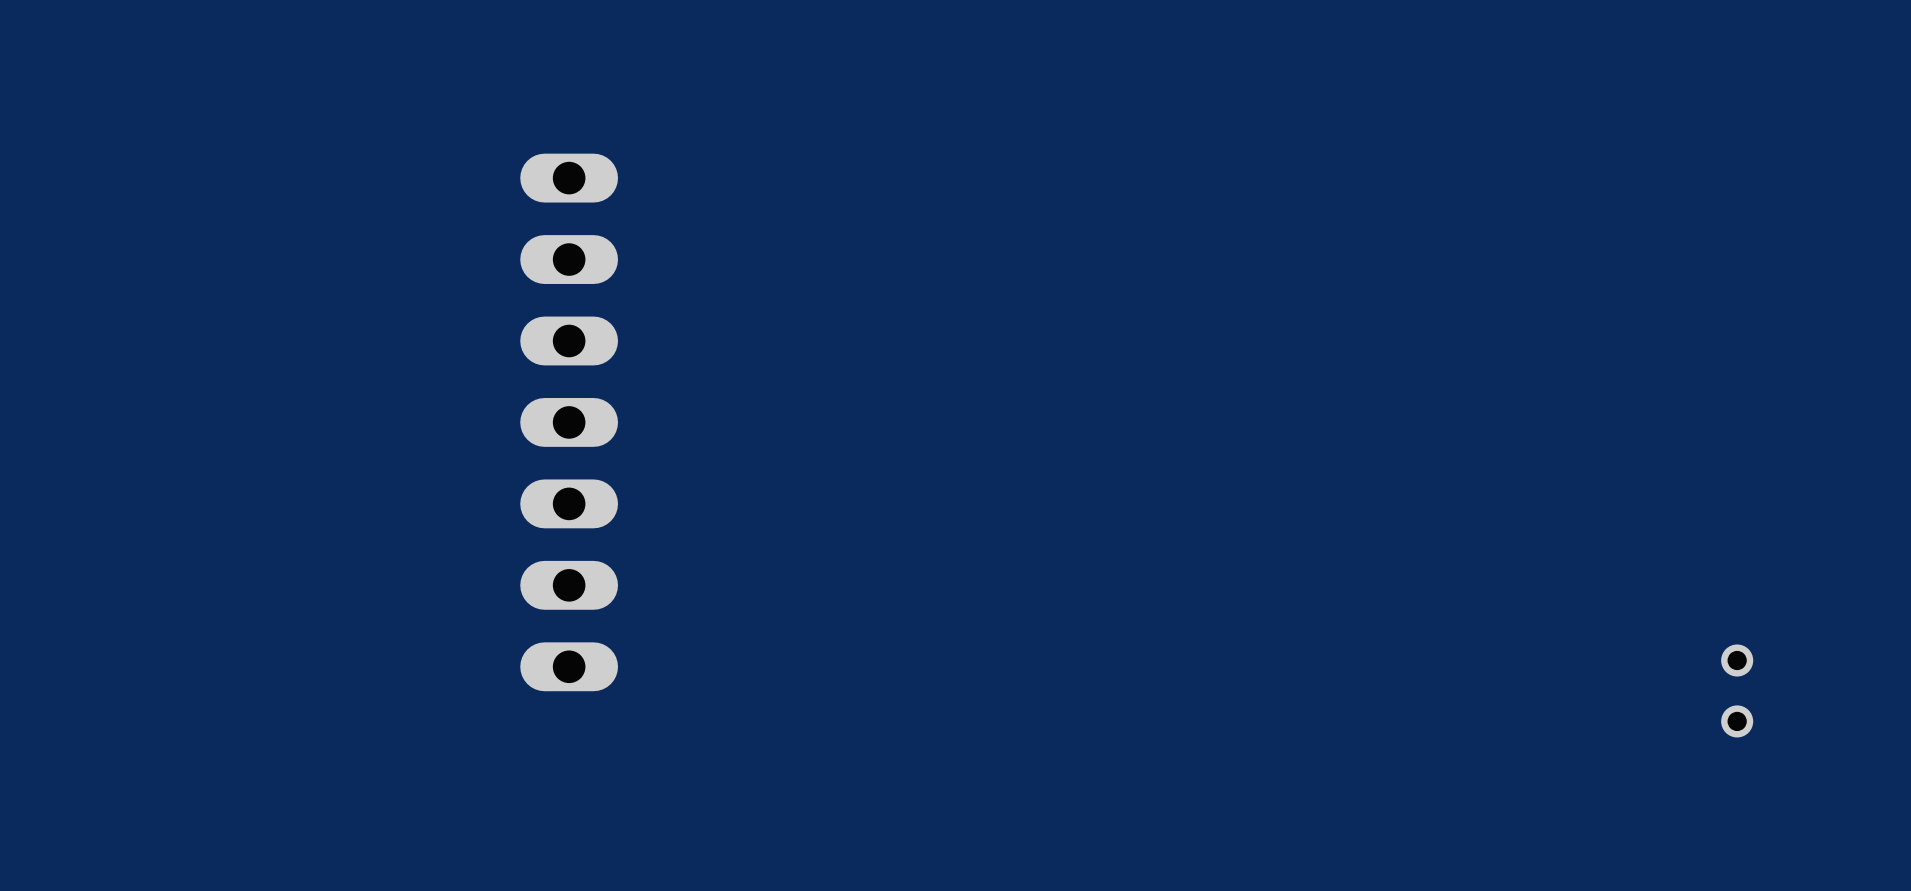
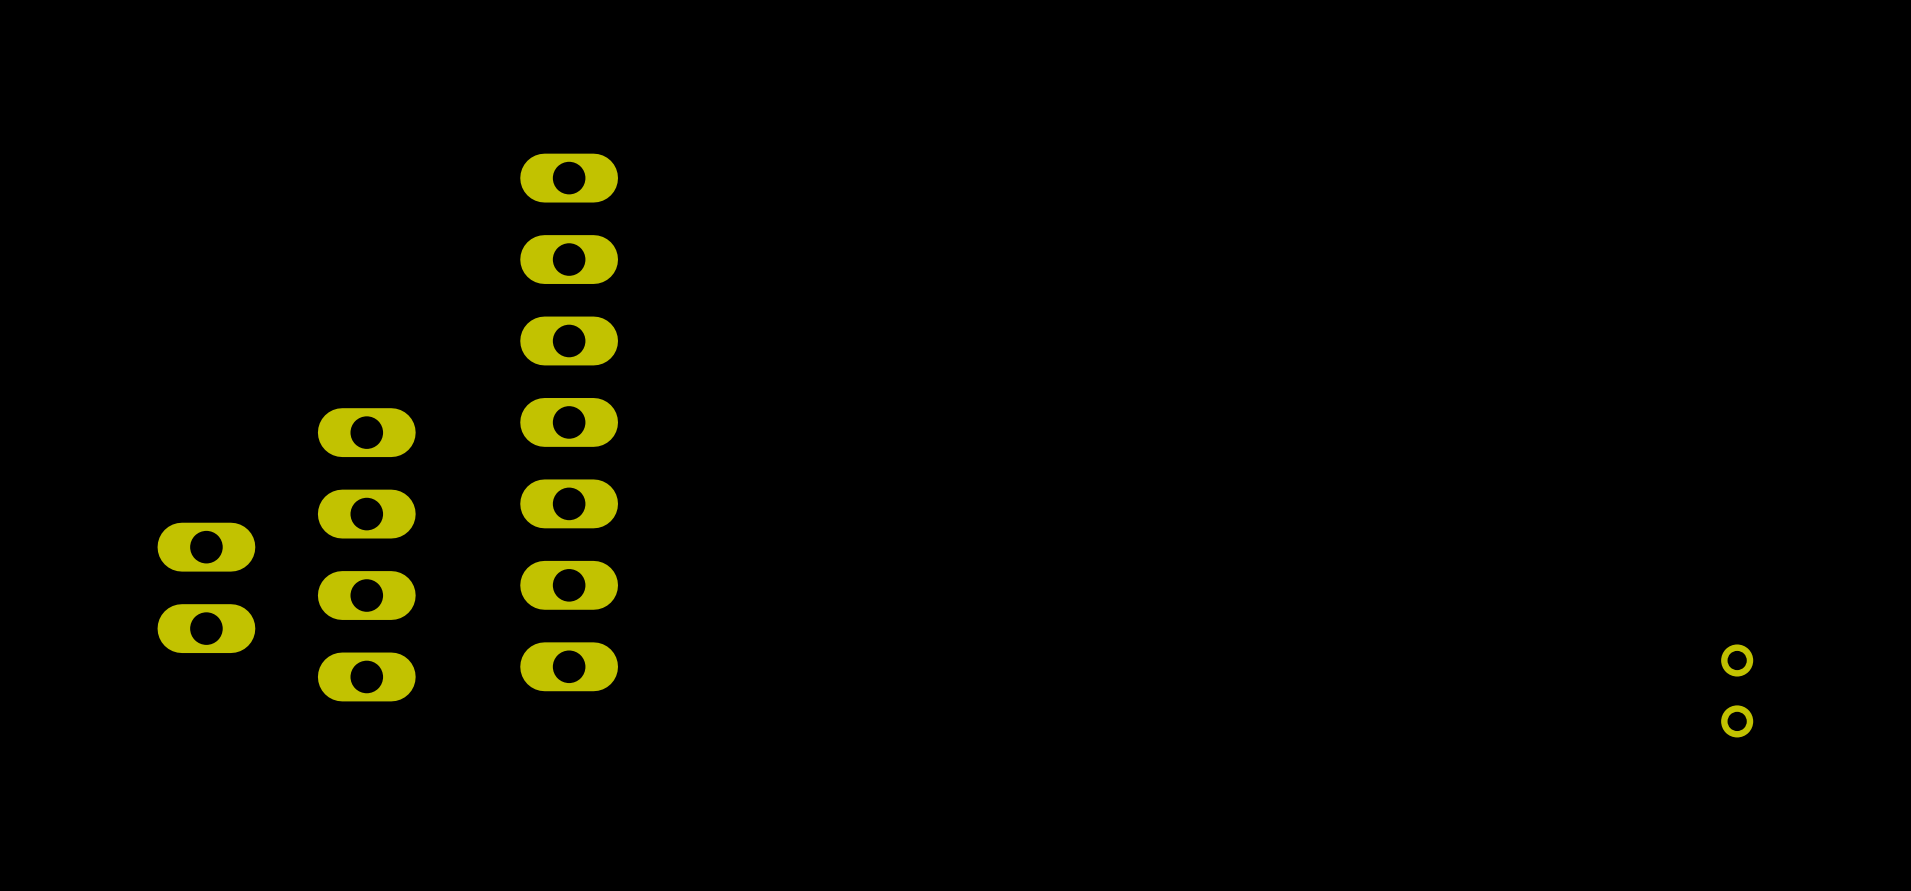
part: none -> (366, 554)
part: none -> (206, 587)

